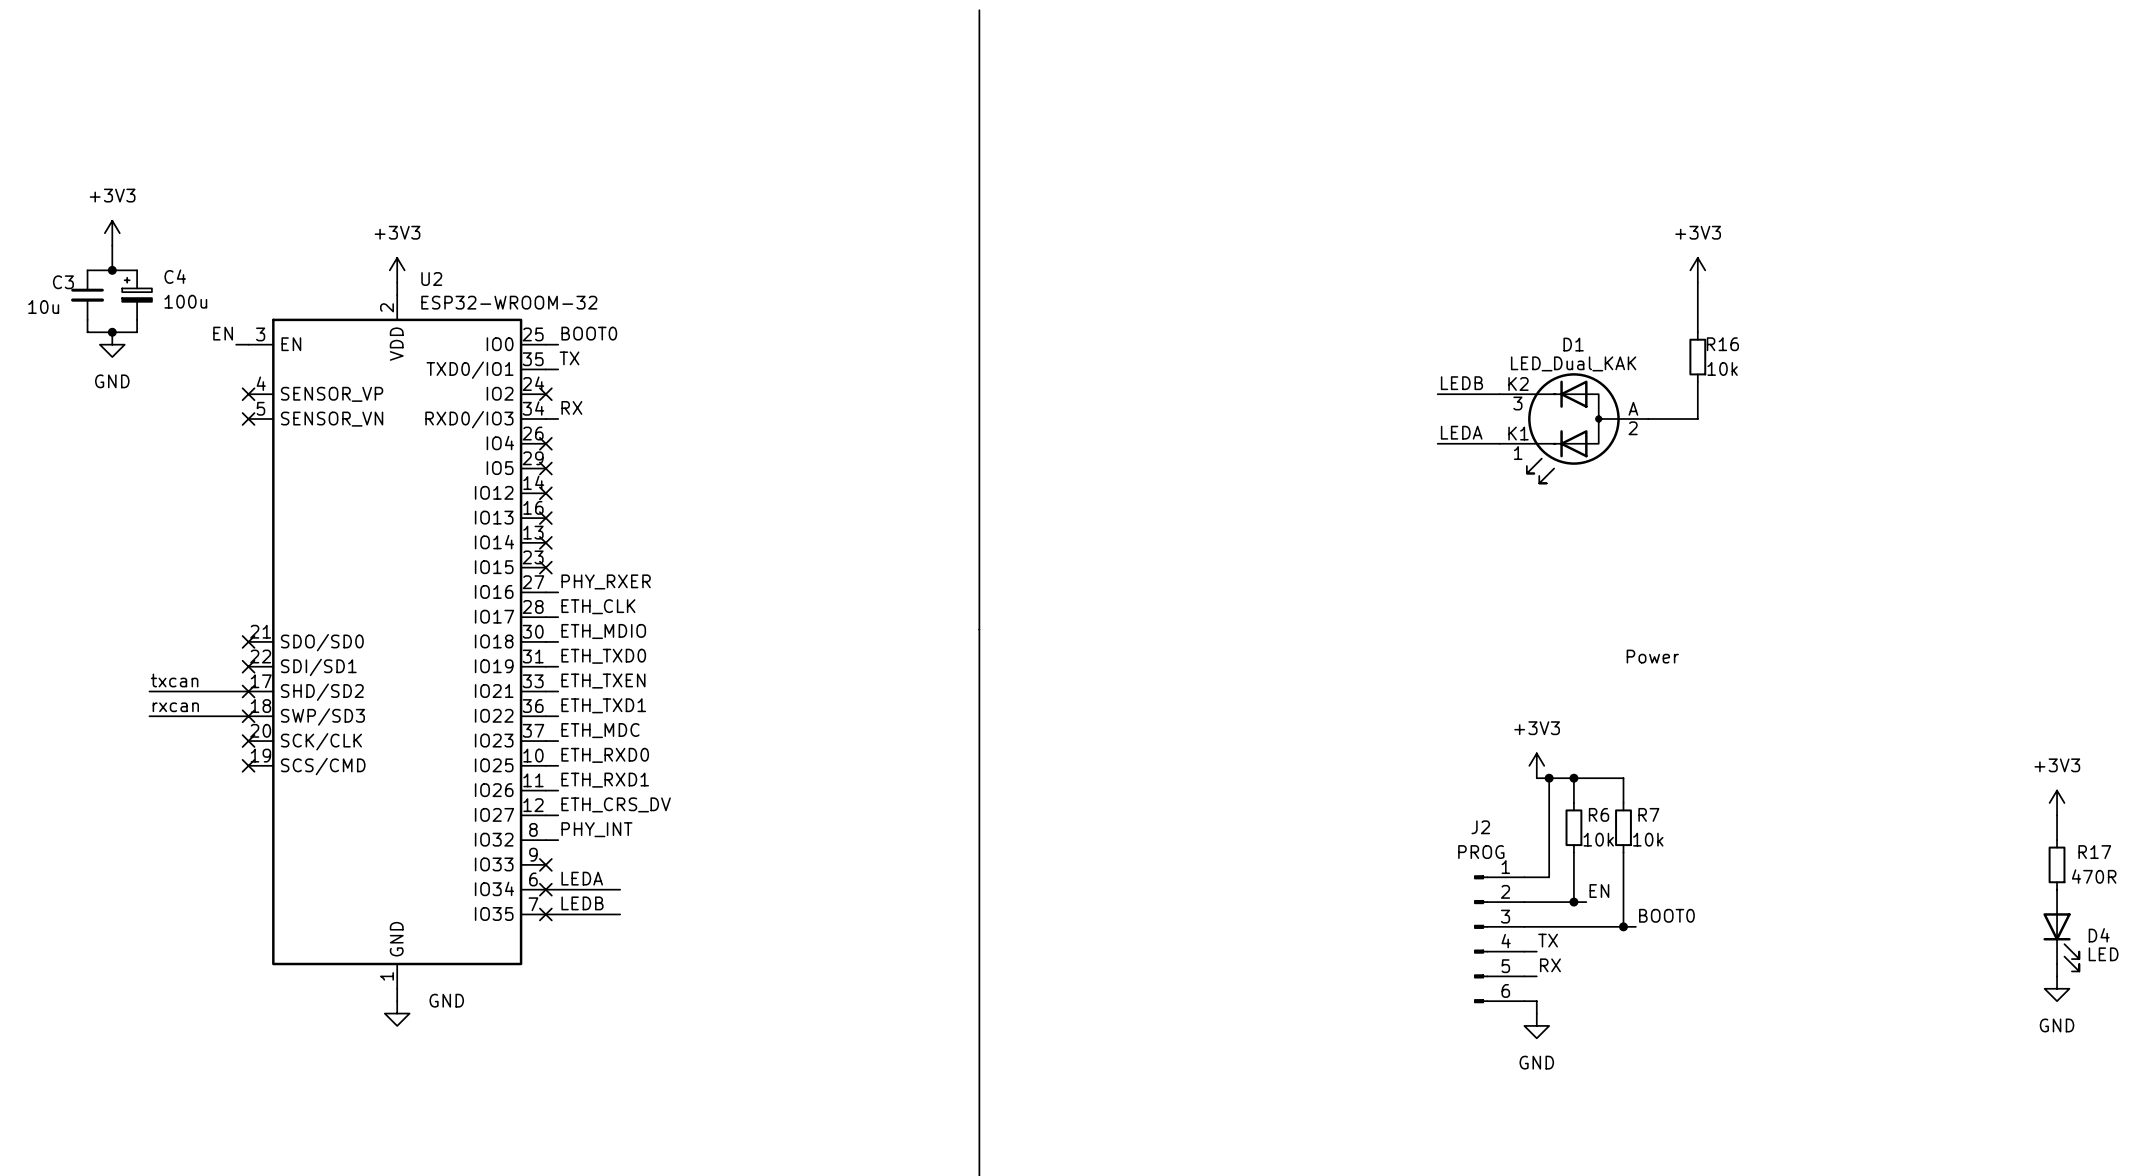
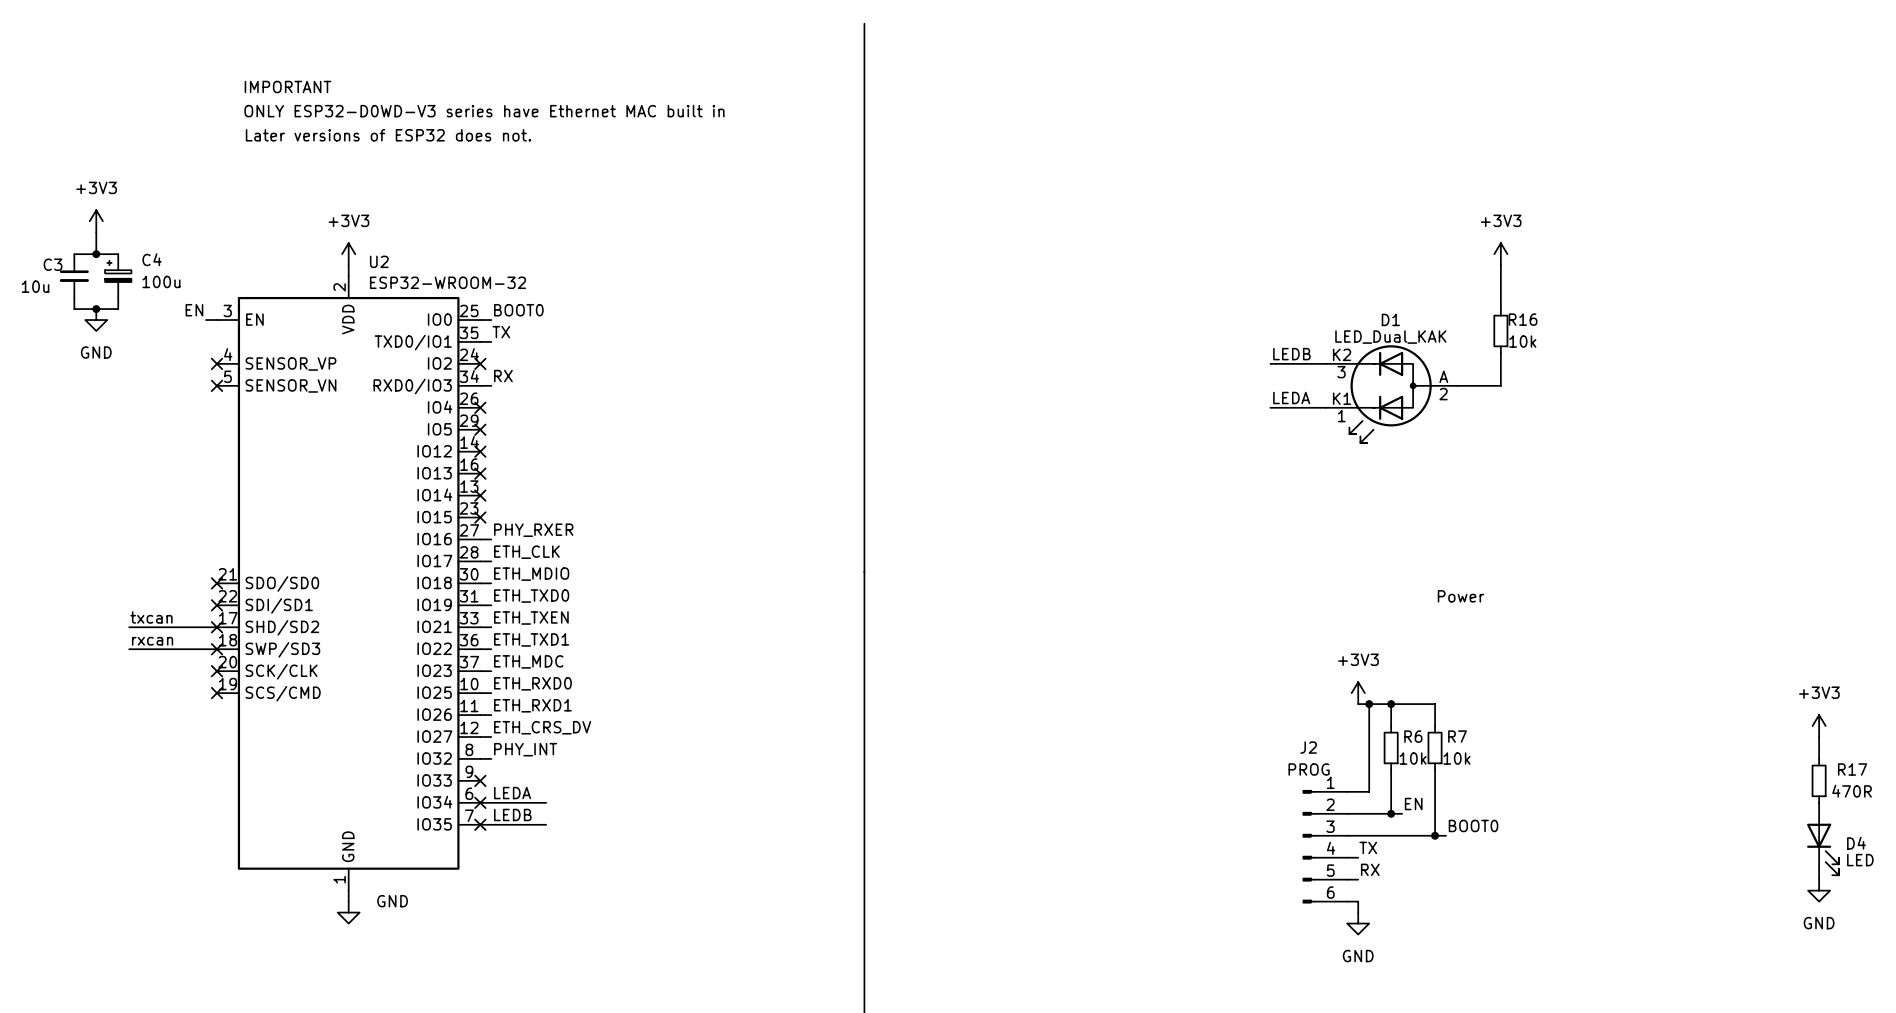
text: none -> IMPORTANT (288, 87)
text: none -> ONLY ESP32-D0WD-V3 series have Ethernet MAC built in (484, 111)
text: none -> Later versions of ESP32 does not. (388, 135)

